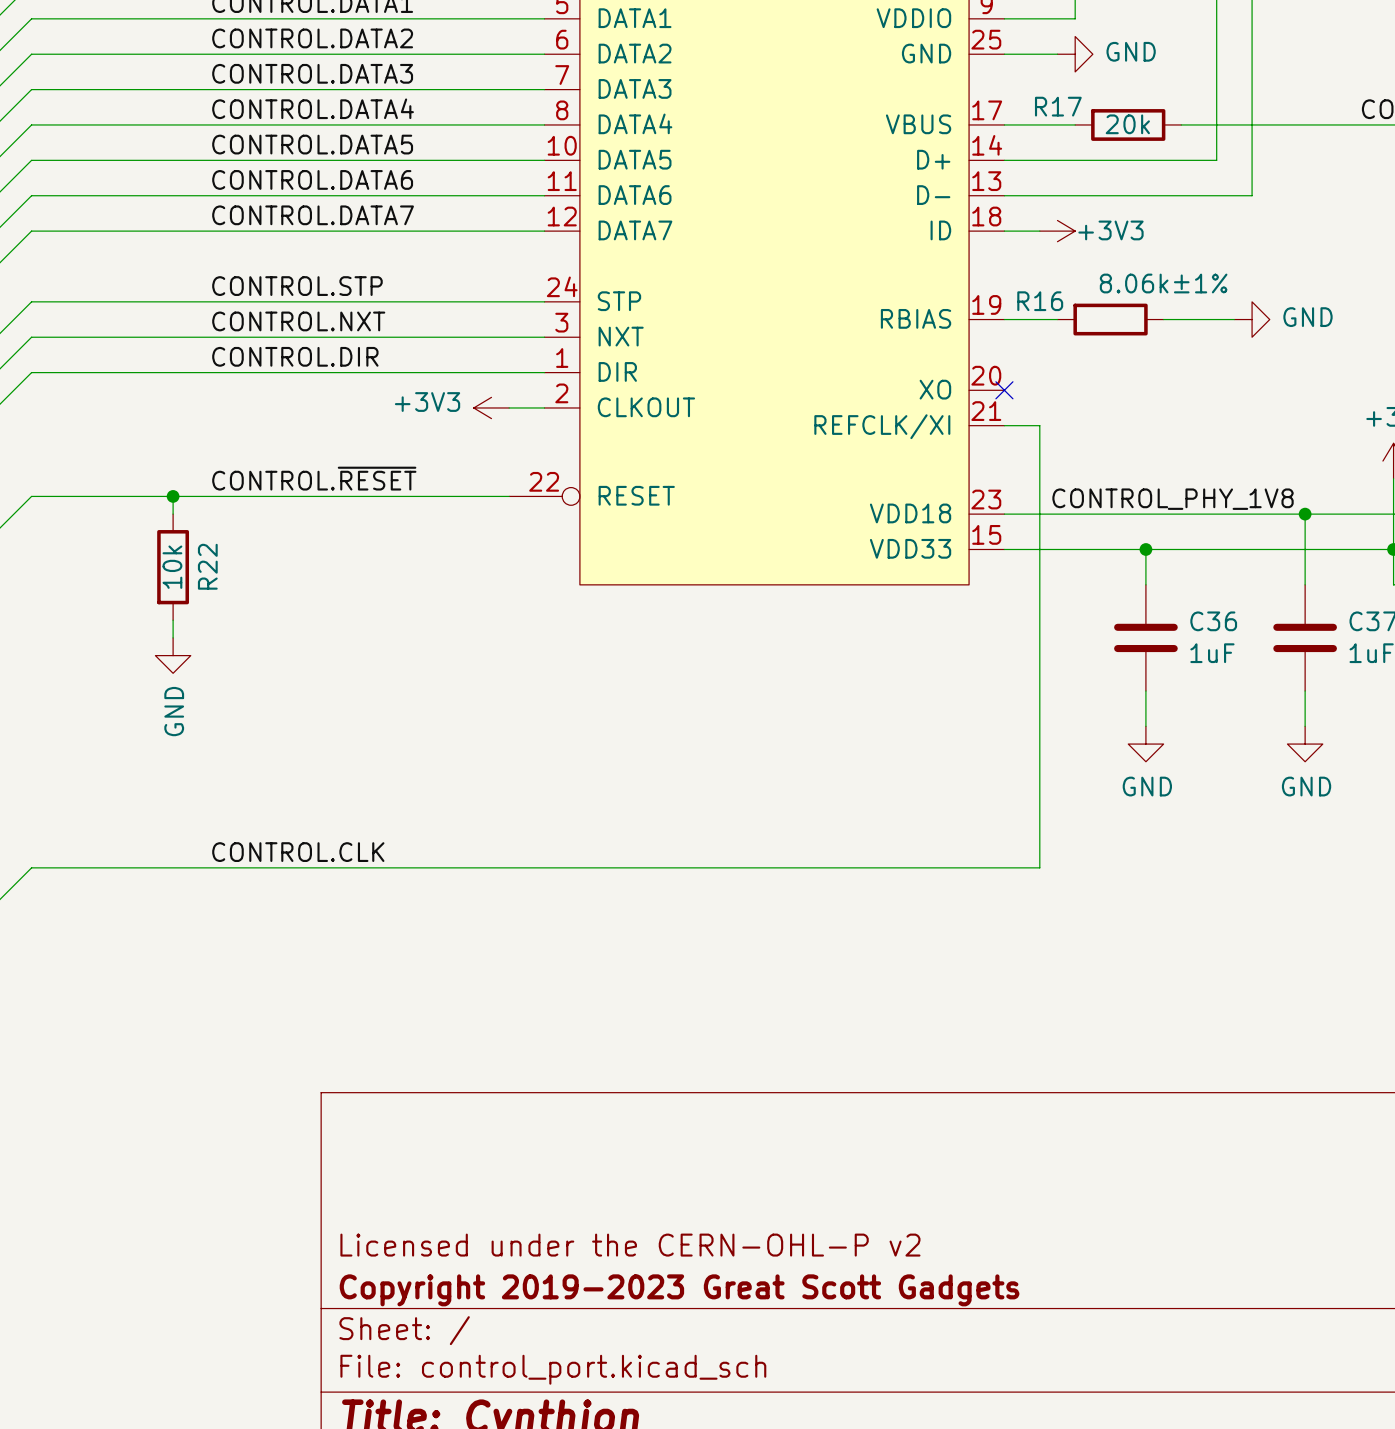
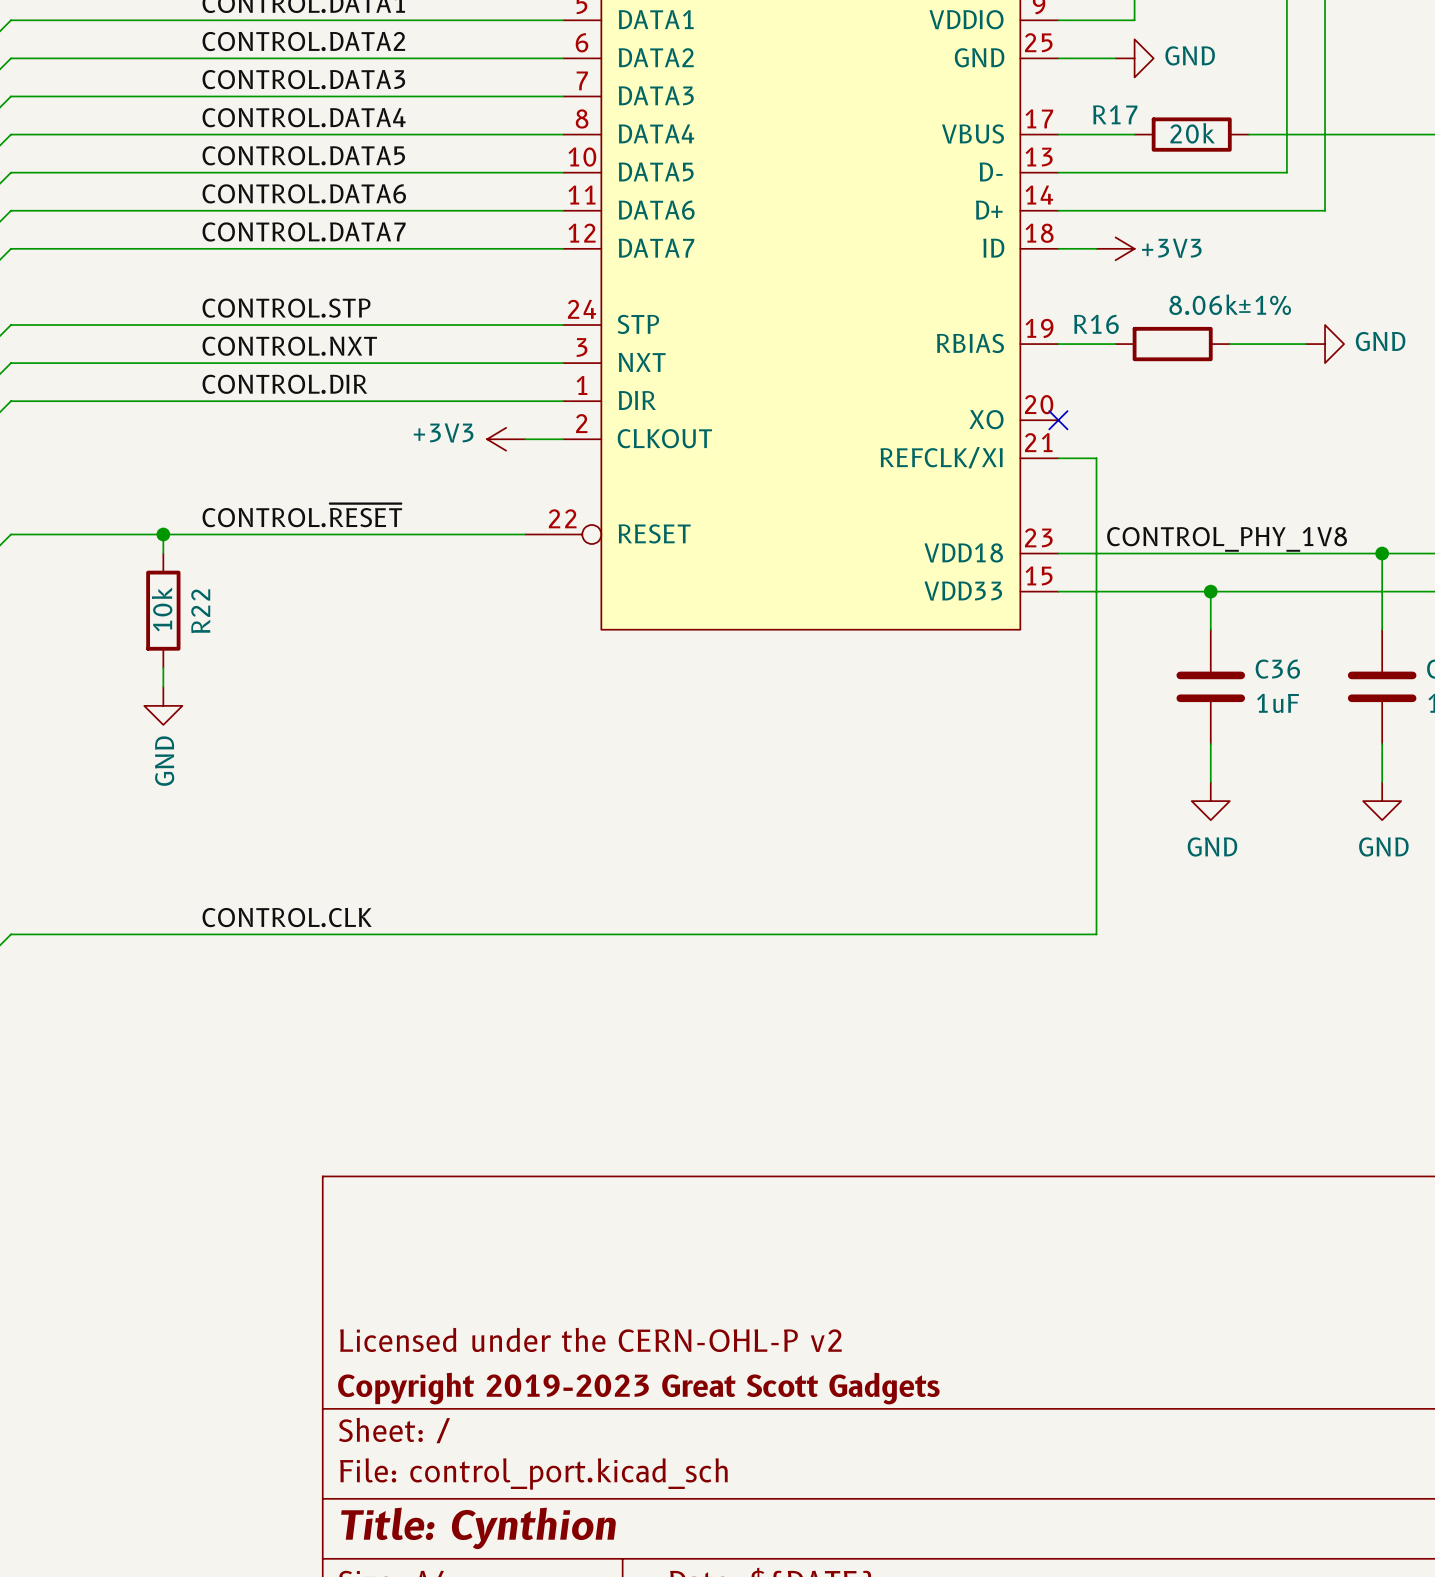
part pin number: 14 (987, 145) -> 13 (1039, 156)
part pin name: D+ (933, 159) -> D- (991, 172)
part pin number: 13 (986, 181) -> 14 (1039, 195)
part pin name: D- (933, 195) -> D+ (989, 210)

